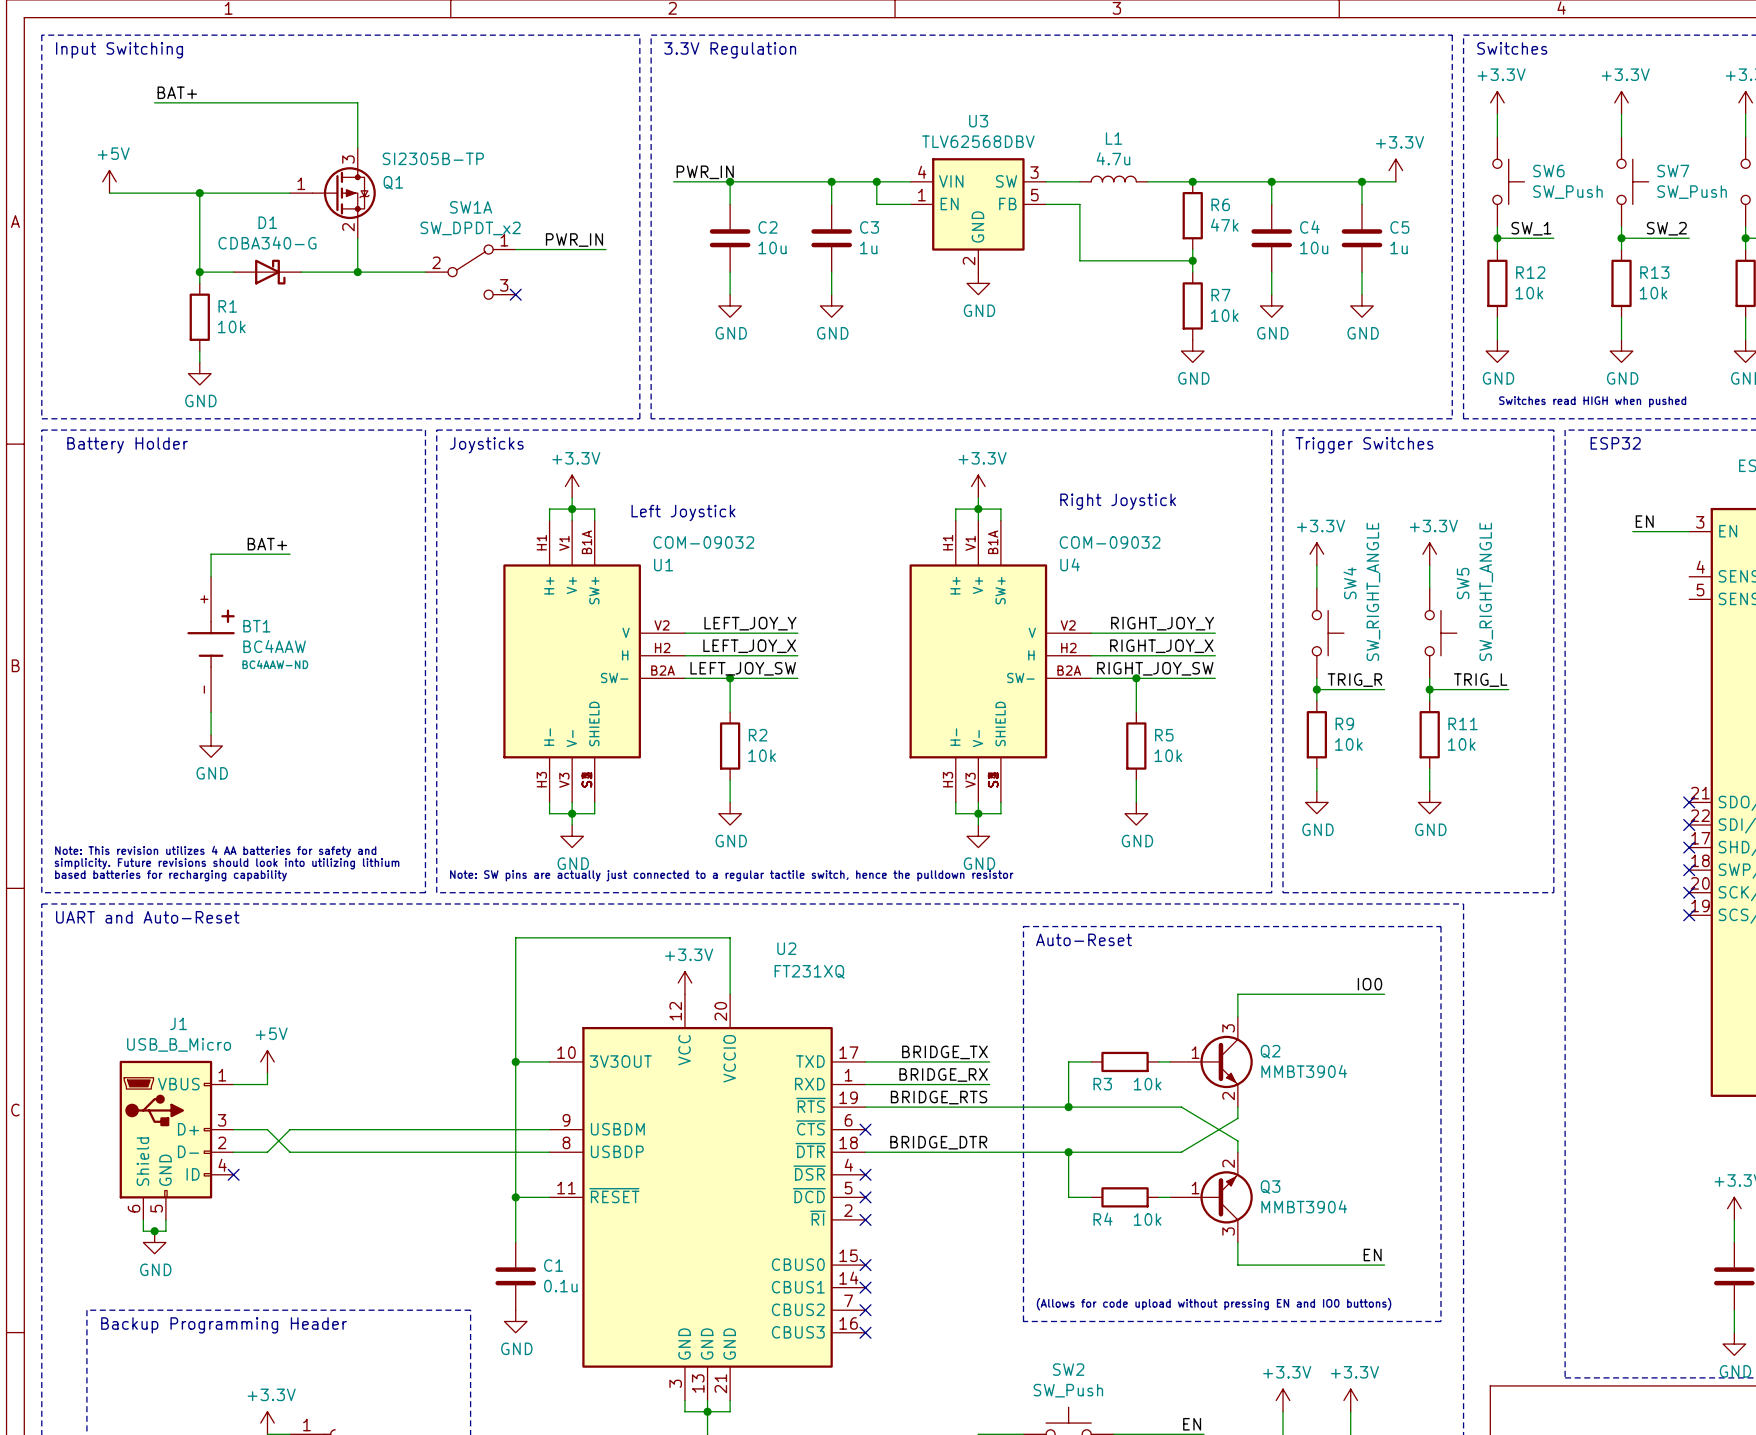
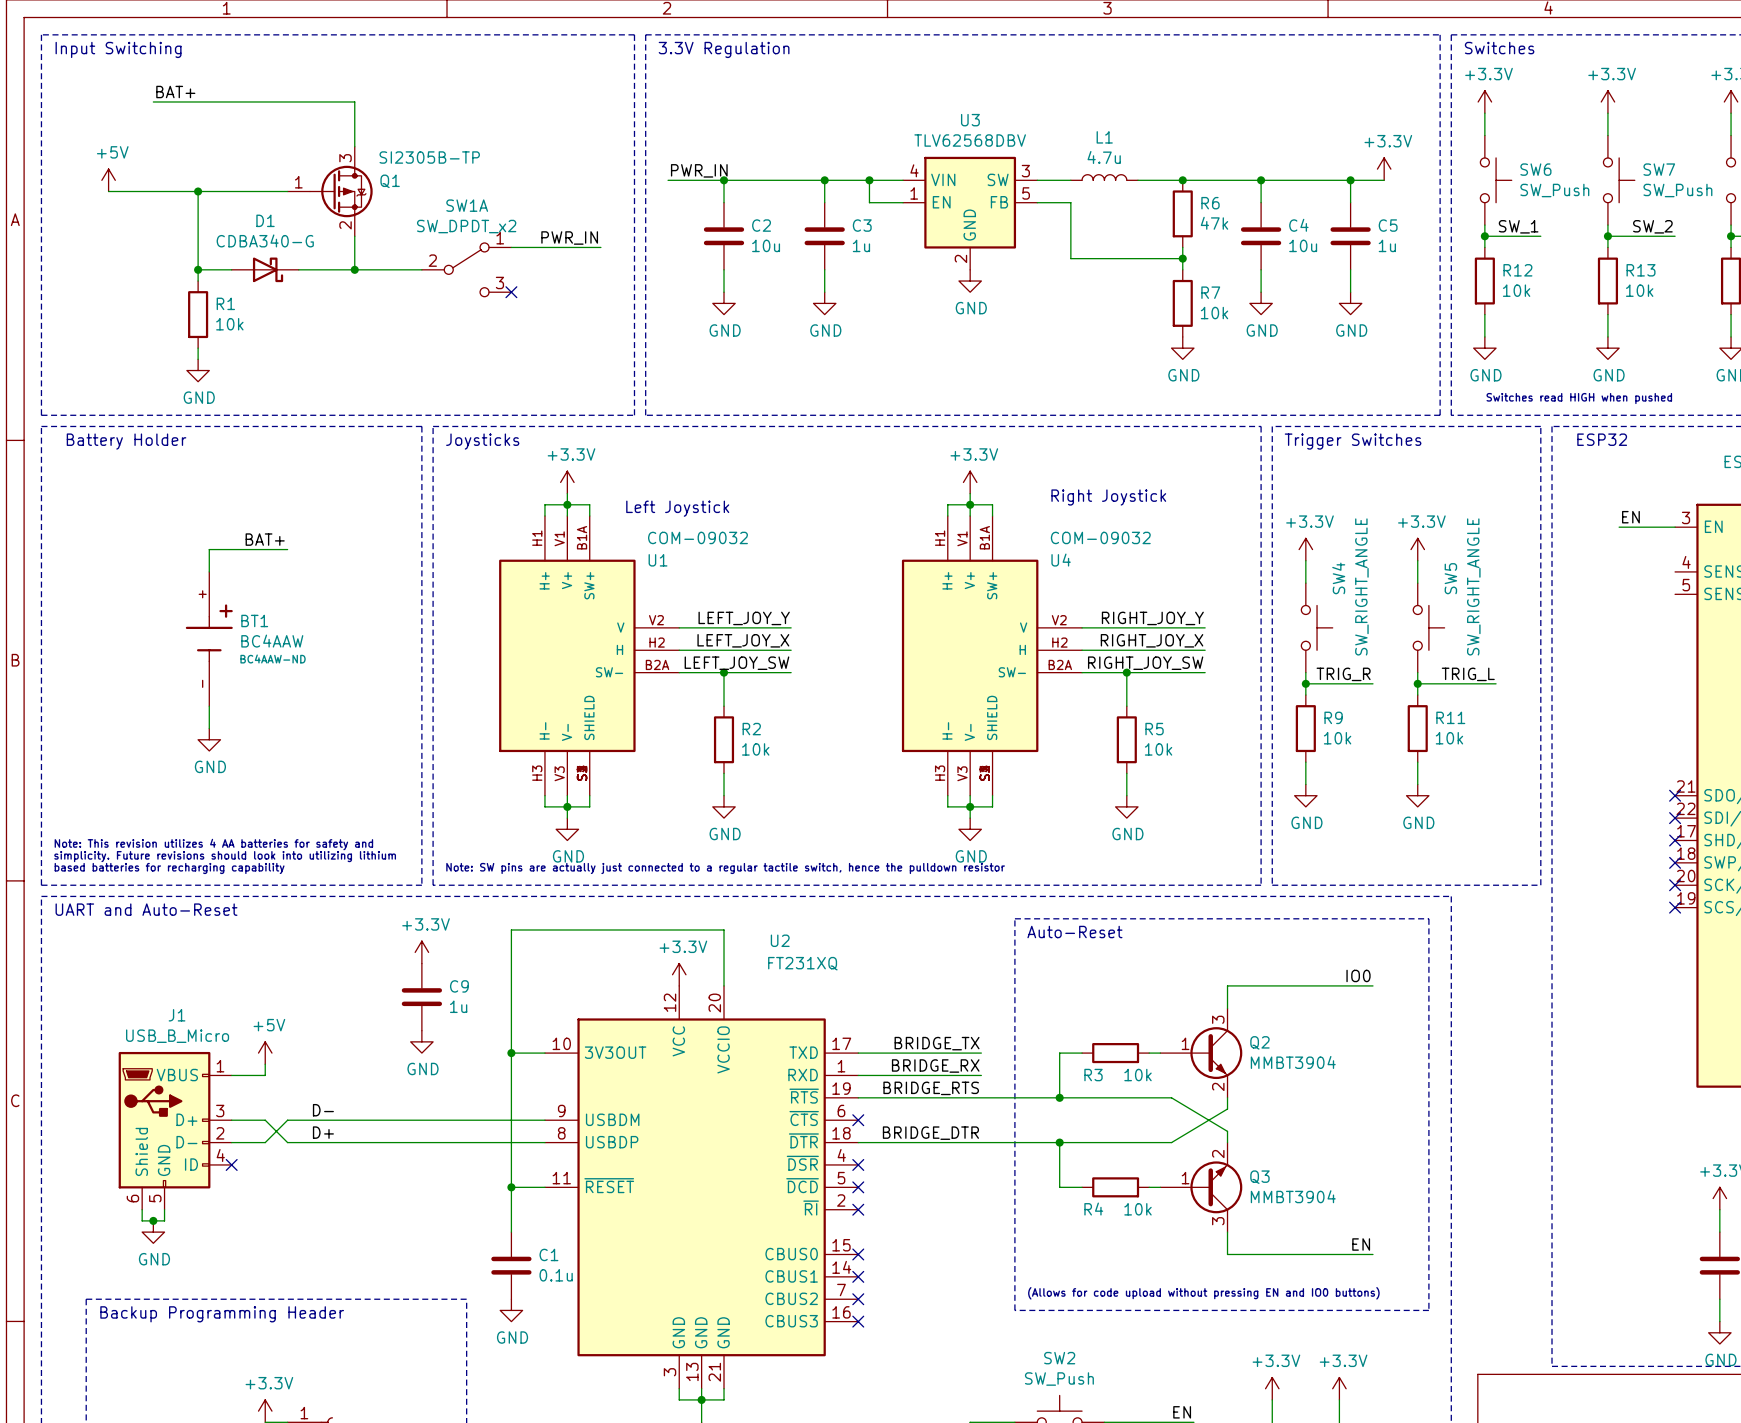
power symbol: none -> +3.3V (421, 952)
C9: none -> 1u (421, 997)
power symbol: none -> GND (421, 1041)
label: none -> D- (323, 1110)
label: none -> D+ (323, 1132)

